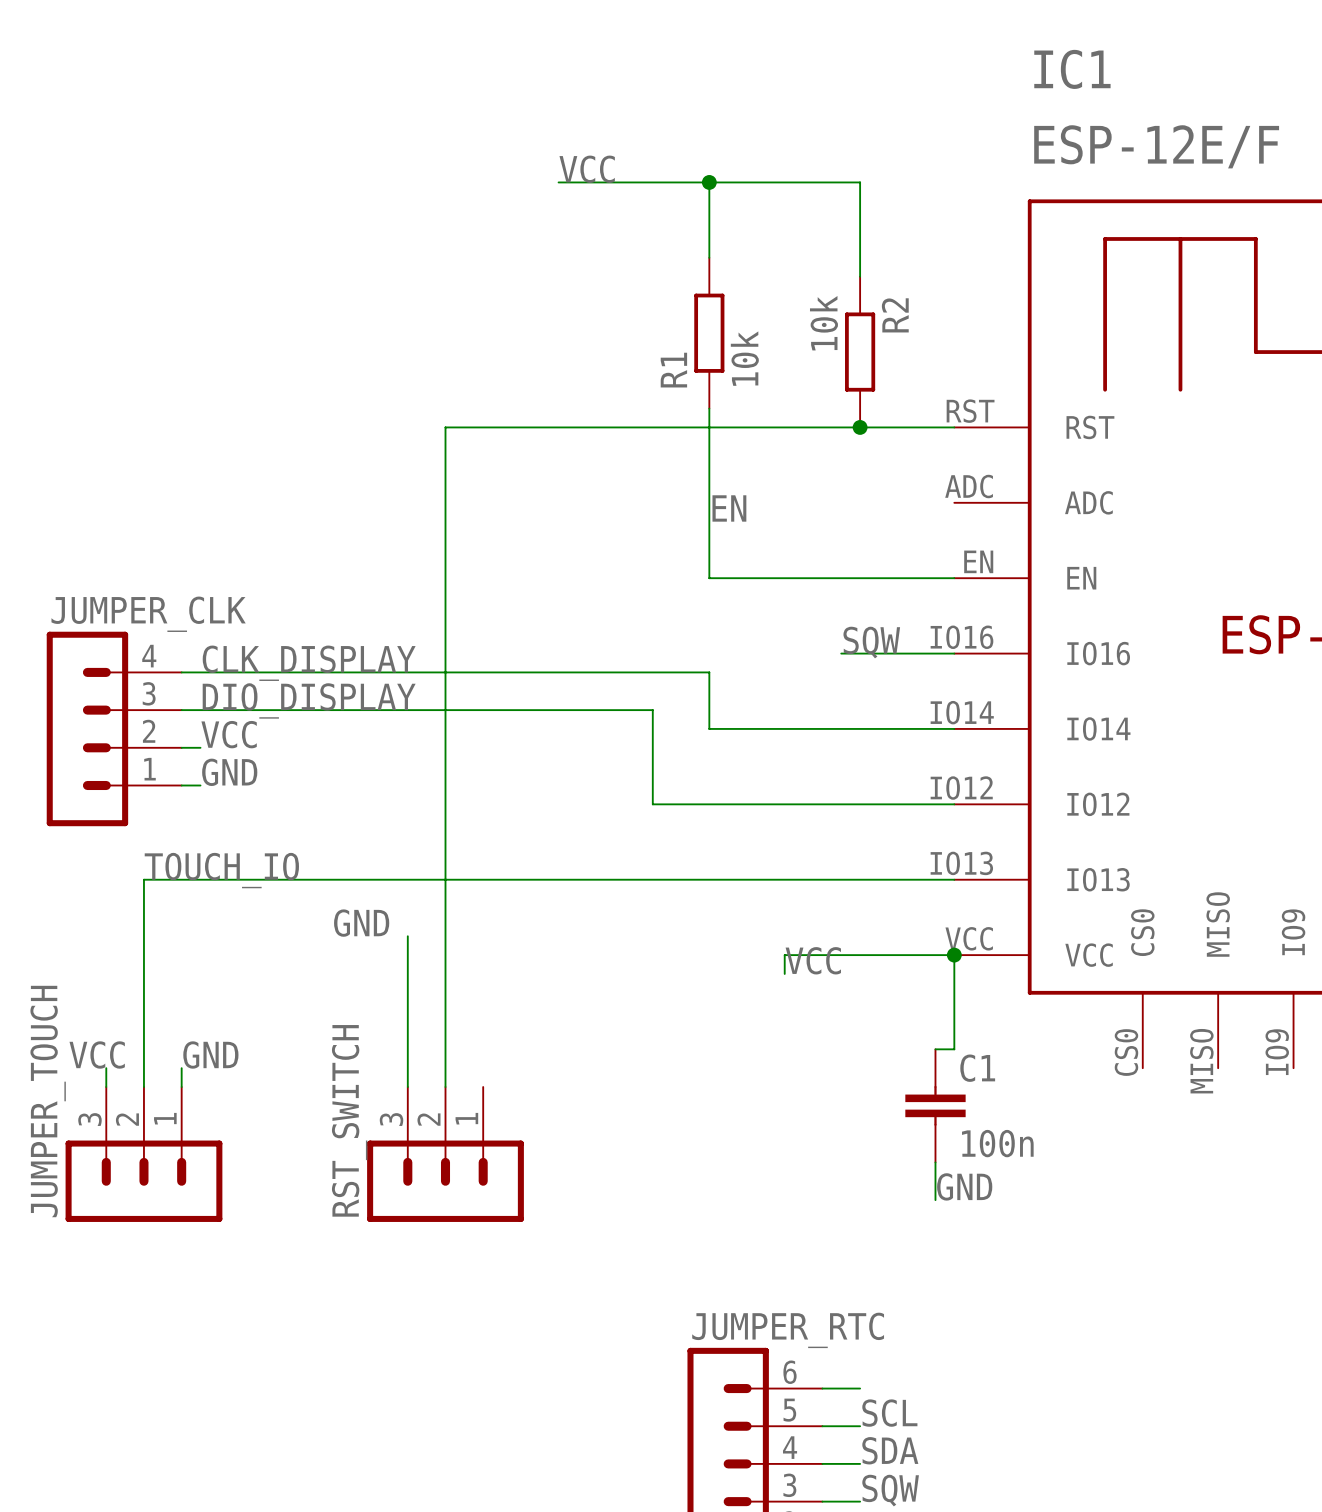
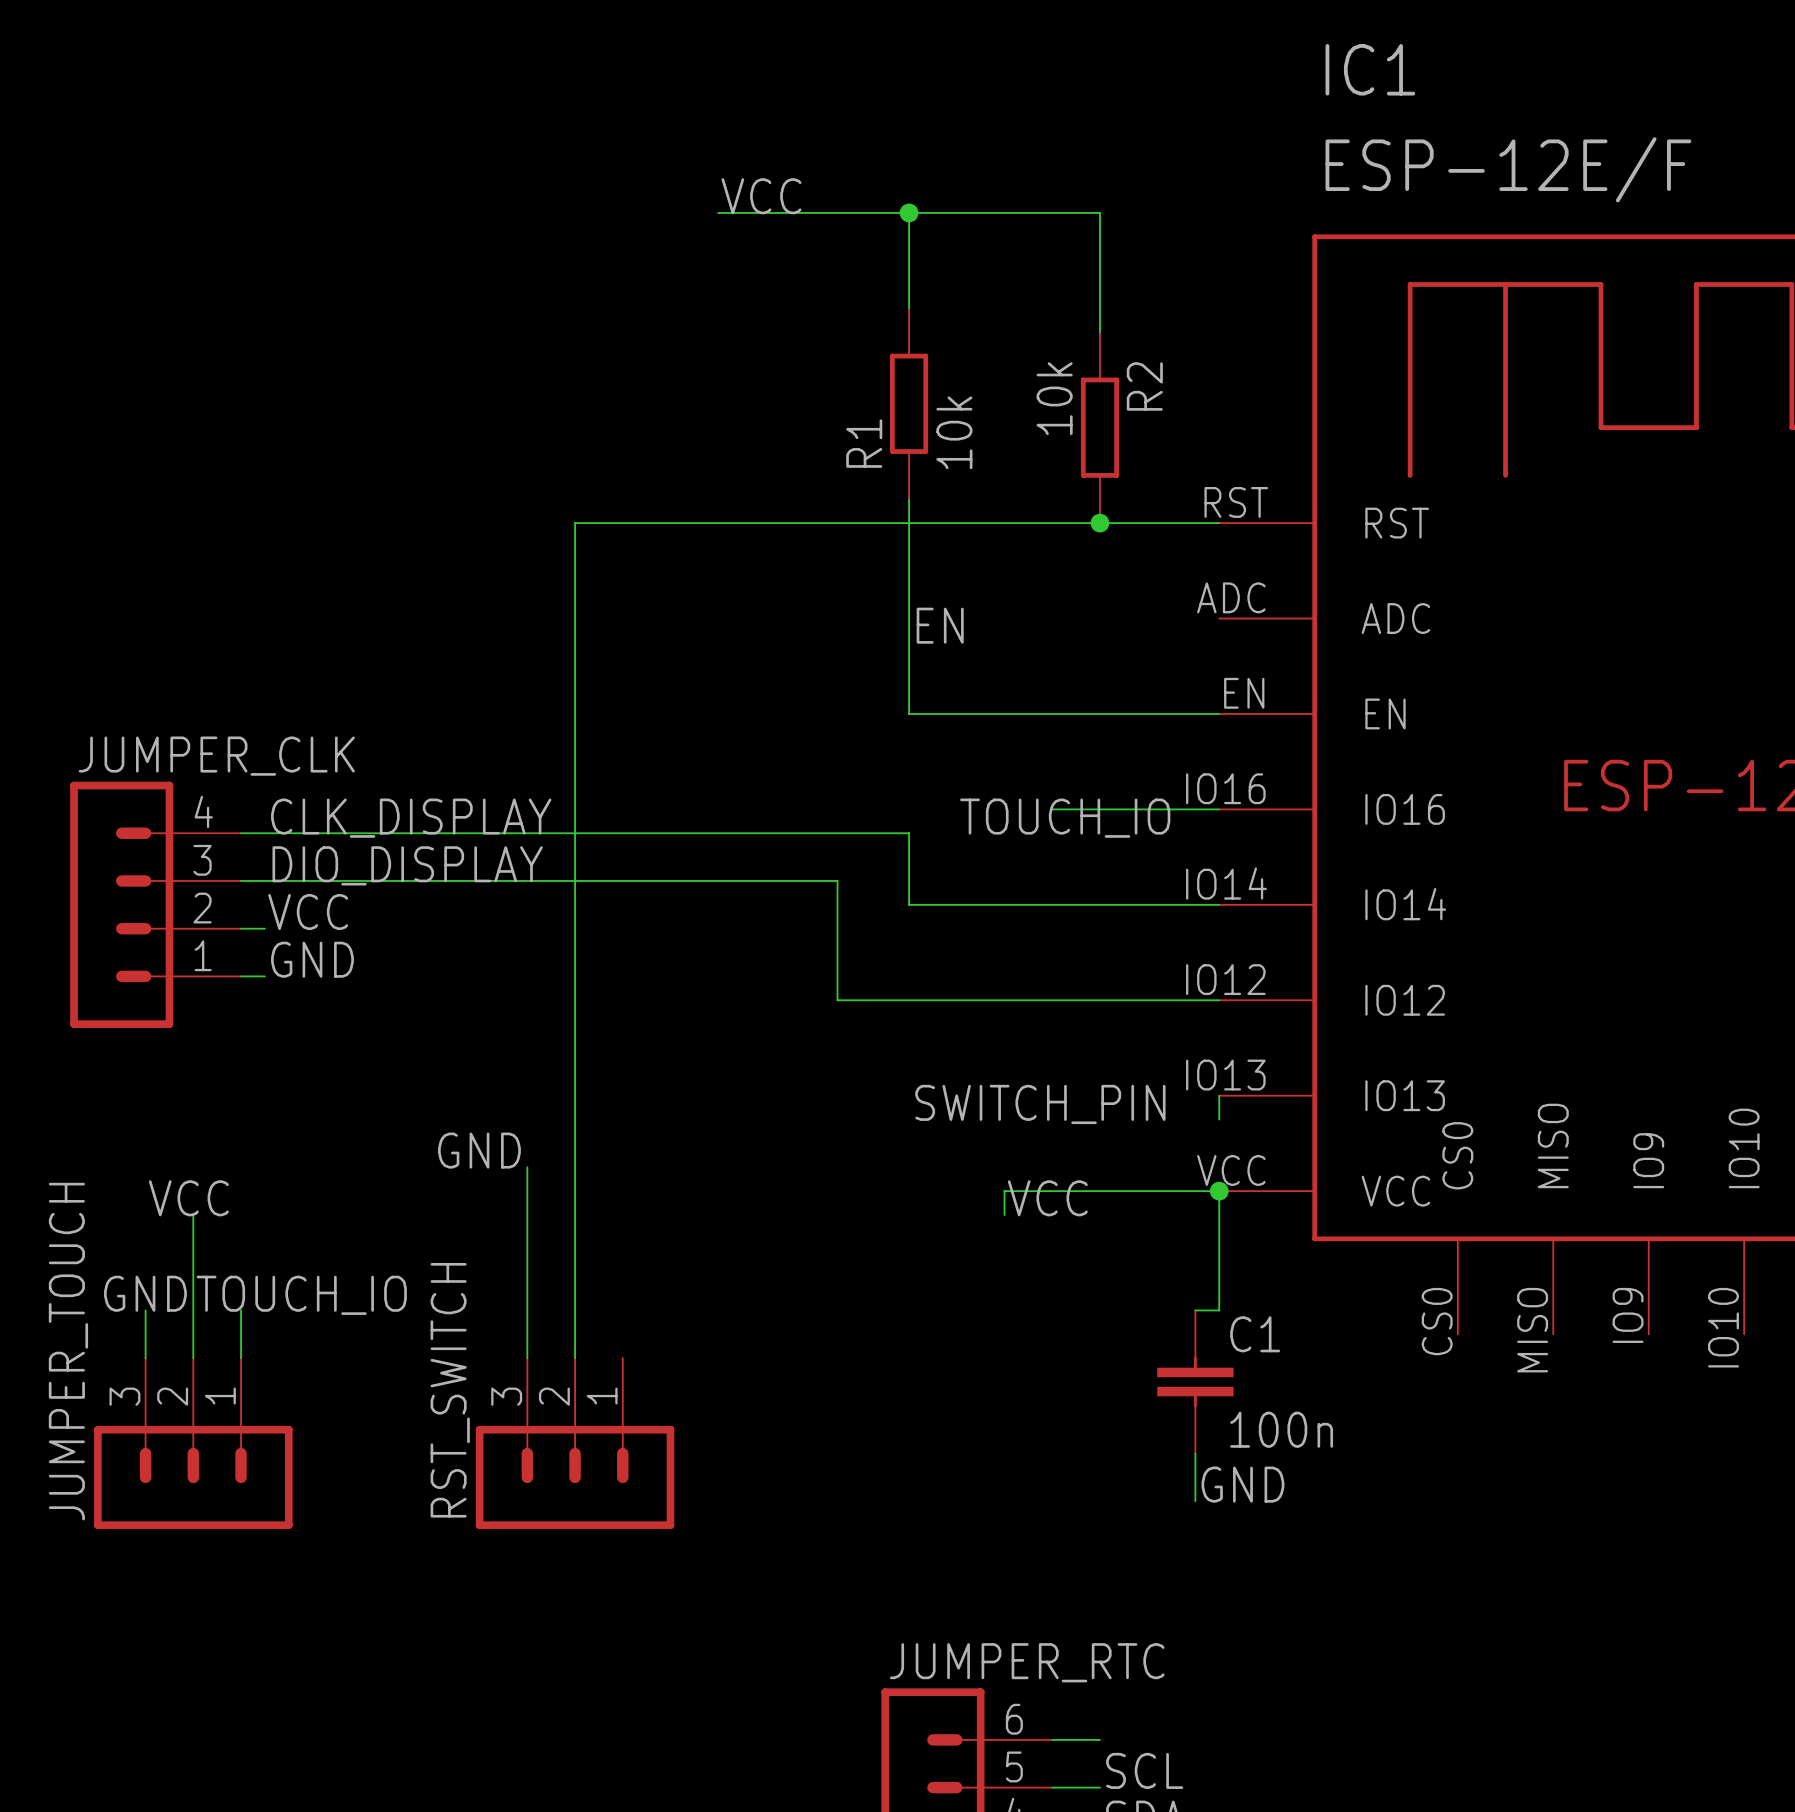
label: SQW (871, 642) -> none
wire: none -> (1052, 809) (1076, 809)
label: none -> TOUCH_IO (1065, 818)
label position: TOUCH_IO (221, 870) -> TOUCH_IO (301, 1295)
wire: (954, 879) (143, 879) (143, 973) -> (1219, 1095) (1219, 1119)
label: none -> SWITCH_PIN (1040, 1104)
wire: none -> (145, 1310) (145, 1334)
wire: none -> (241, 1310) (241, 1334)
label position: VCC (97, 1055) -> VCC (188, 1198)
label position: GND (210, 1055) -> GND (145, 1293)

